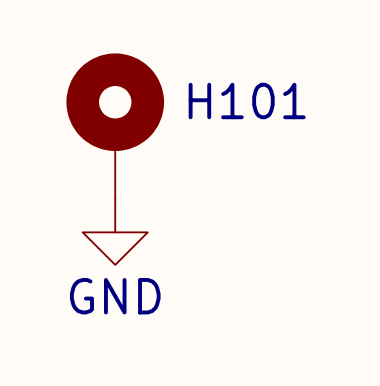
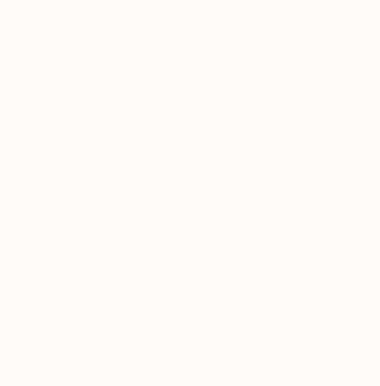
H101: (115, 126) -> none
power symbol: GND (115, 232) -> none

